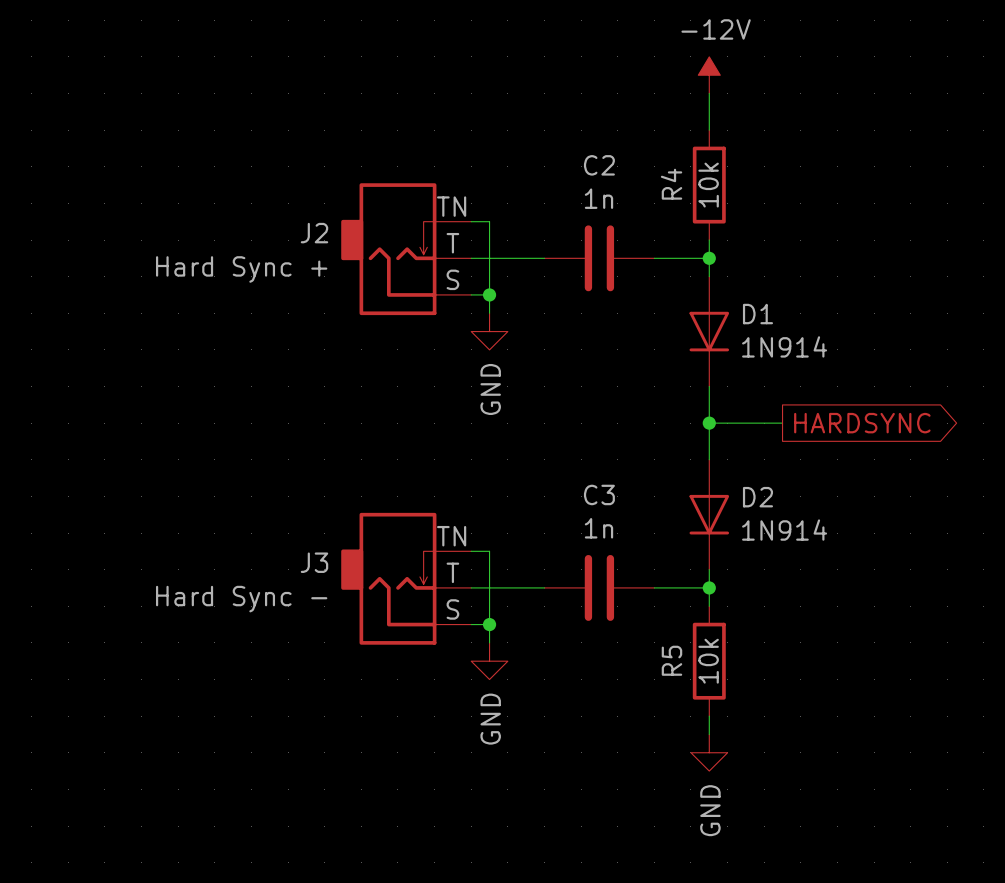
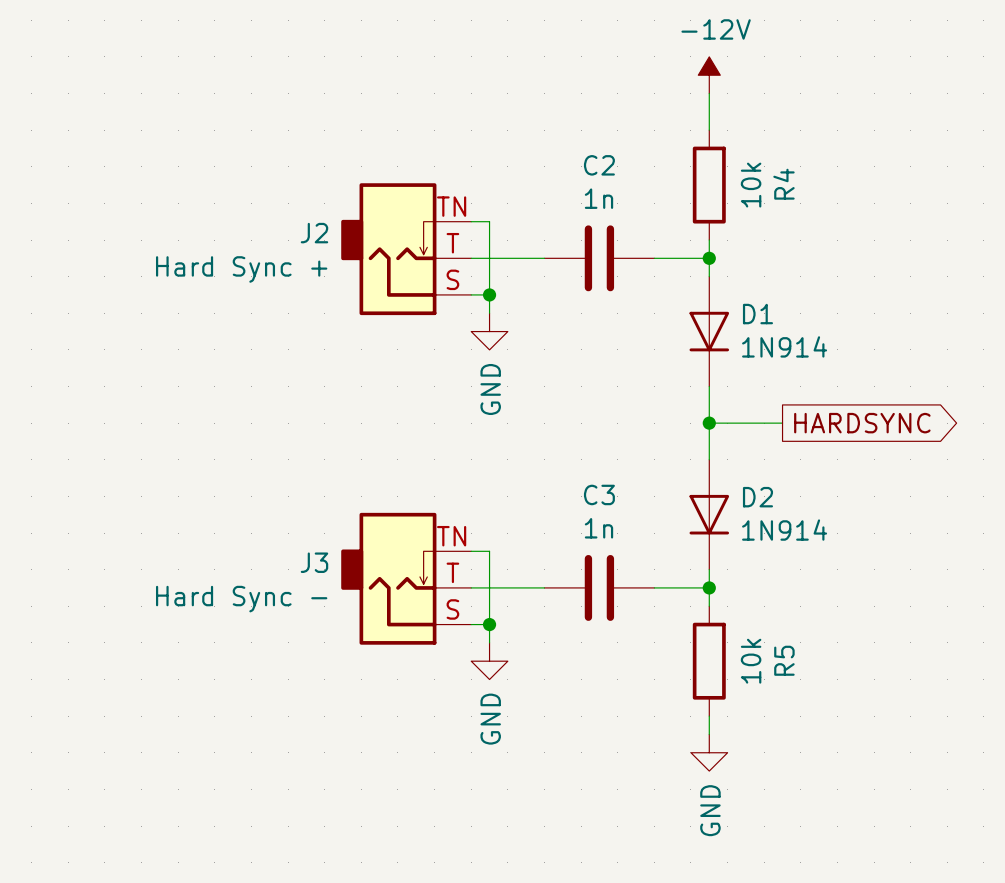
R4 name position: R4 (671, 184) -> R4 (783, 184)
R4 value position: 10k (708, 185) -> 10k (751, 185)
R5 name position: R5 (671, 660) -> R5 (784, 660)
R5 value position: 10k (708, 661) -> 10k (751, 661)

